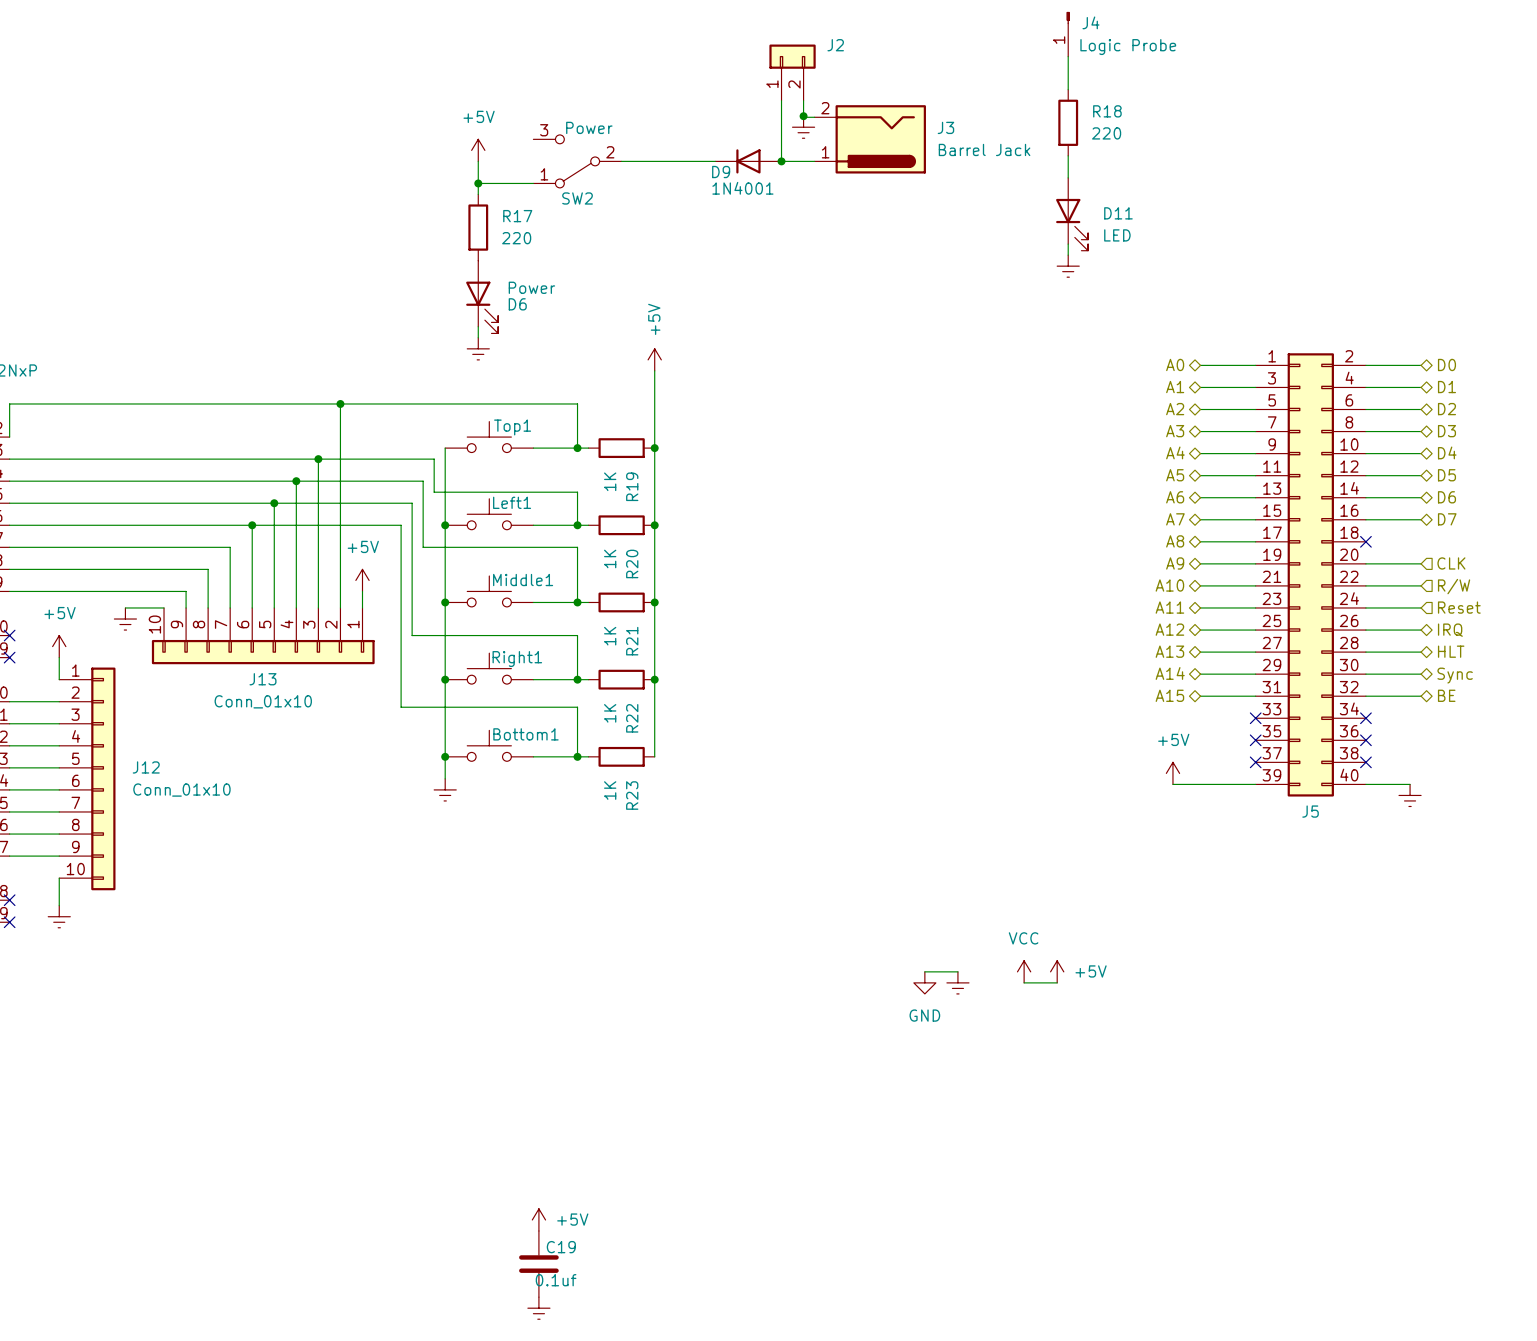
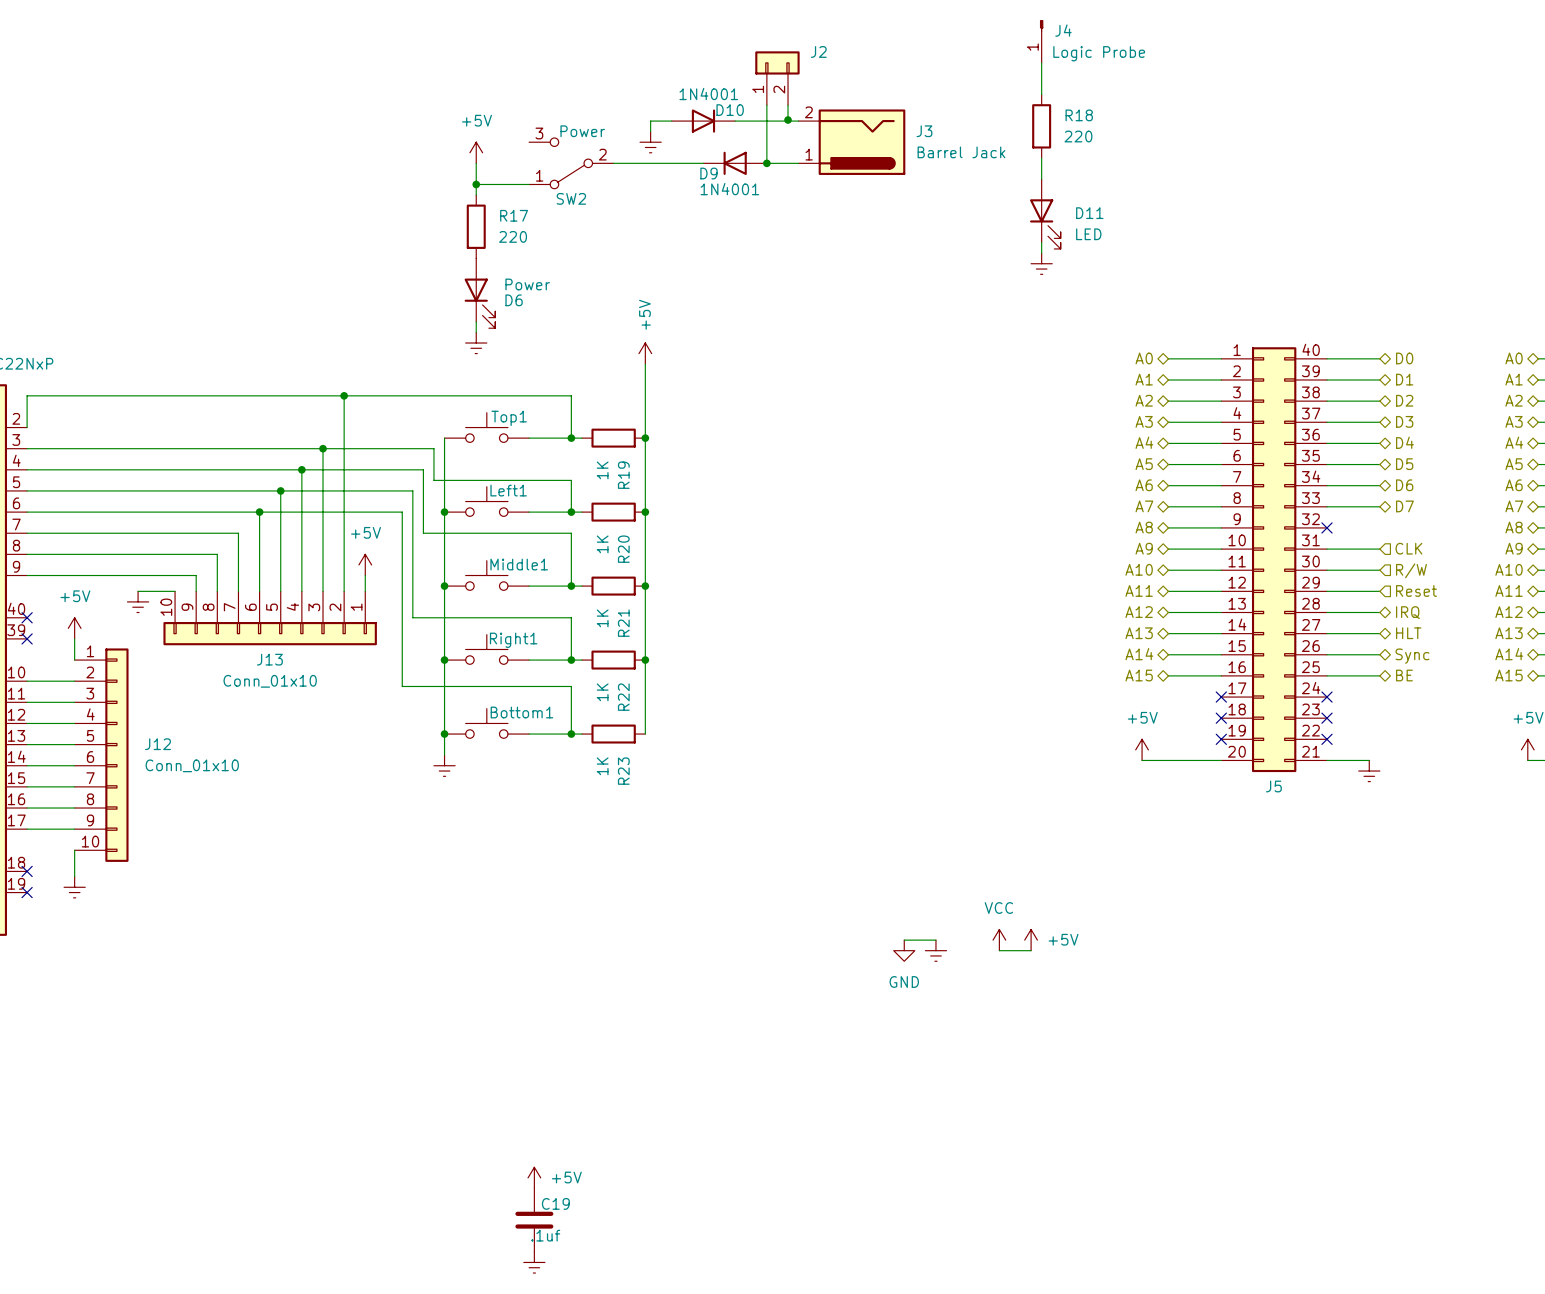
wire: none -> (671, 121) (650, 121) (650, 131)
D10: none -> 1N4001 (703, 121)
wire: none -> (735, 121) (788, 121)
power symbol position: (803, 127) -> (650, 142)
J5 symbol: [1255, 353, 1366, 797] -> [1221, 347, 1328, 773]
C19 value: 0.1uf (556, 1280) -> .1uf (545, 1235)

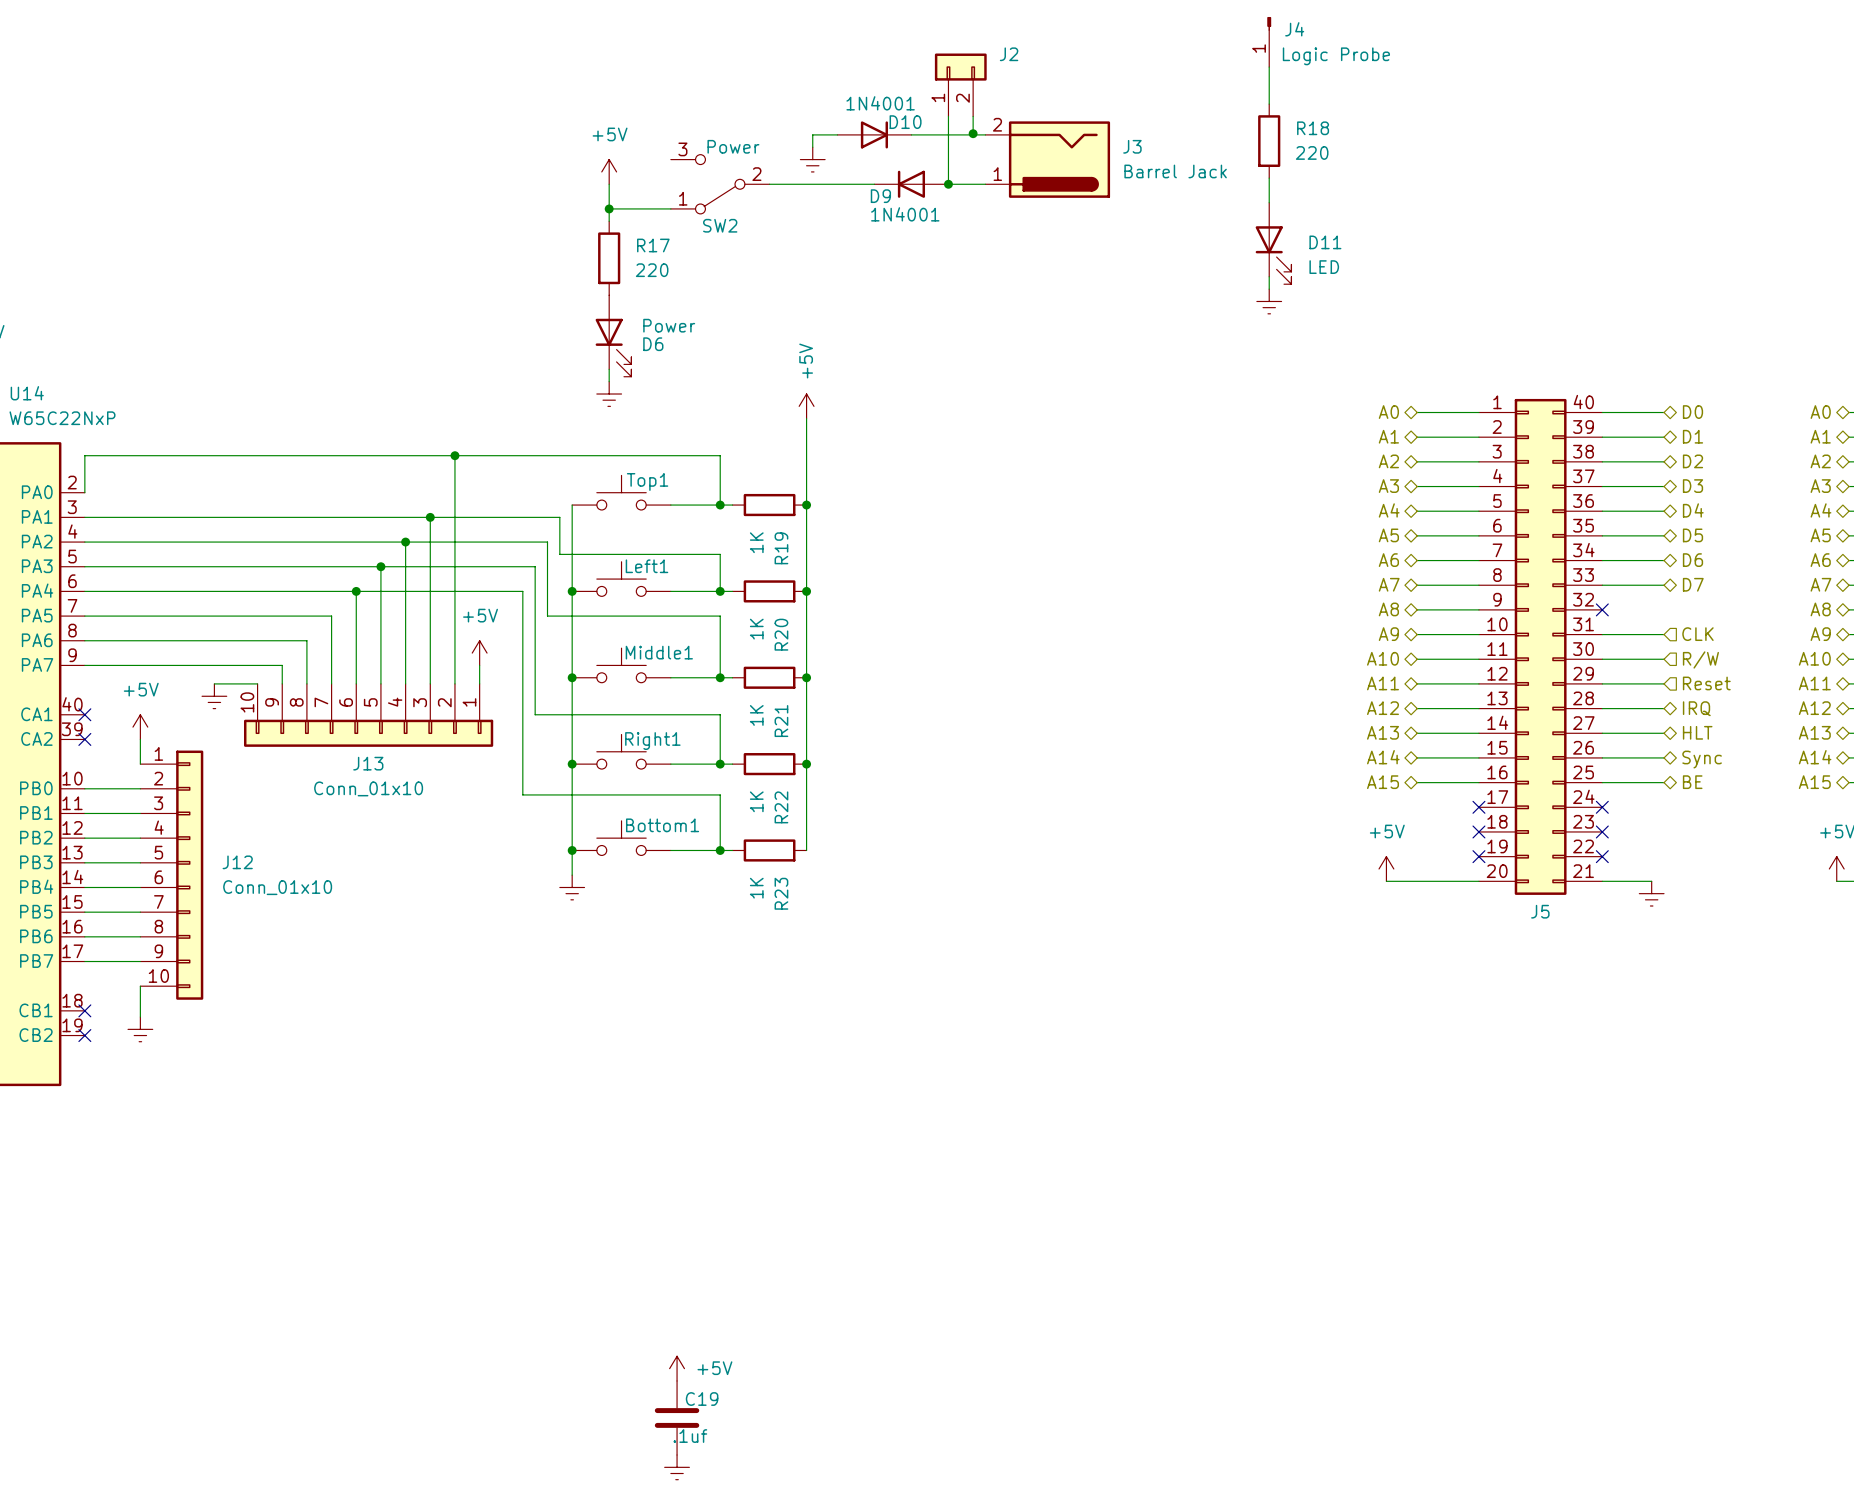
wire: (904, 940) (935, 940) -> none
power symbol: VCC (999, 940) -> none
power symbol: +5V (1031, 940) -> none
power symbol: GND (904, 950) -> none
power symbol: (935, 950) -> none
wire: (999, 950) (1031, 950) -> none

